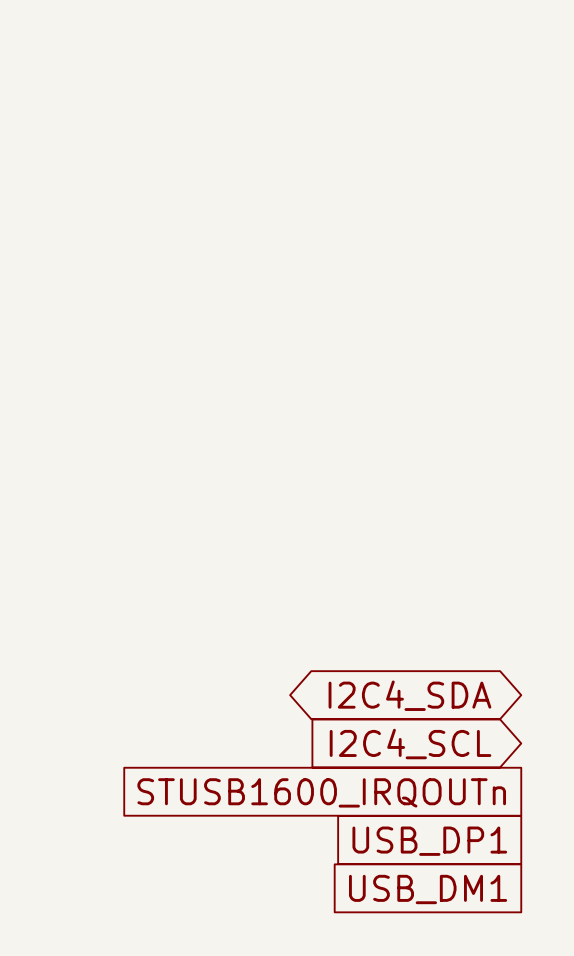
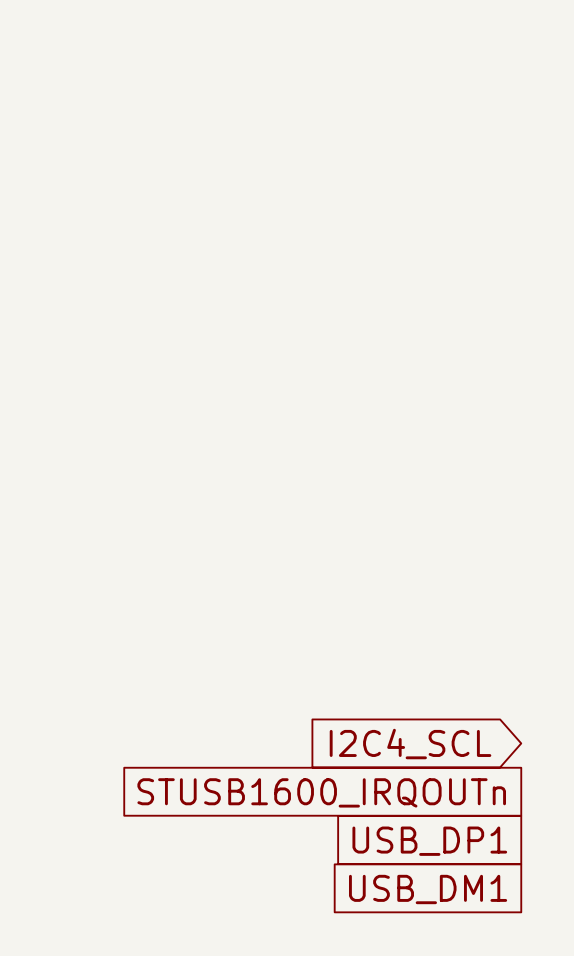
global label: I2C4_SDA (409, 695) -> none

